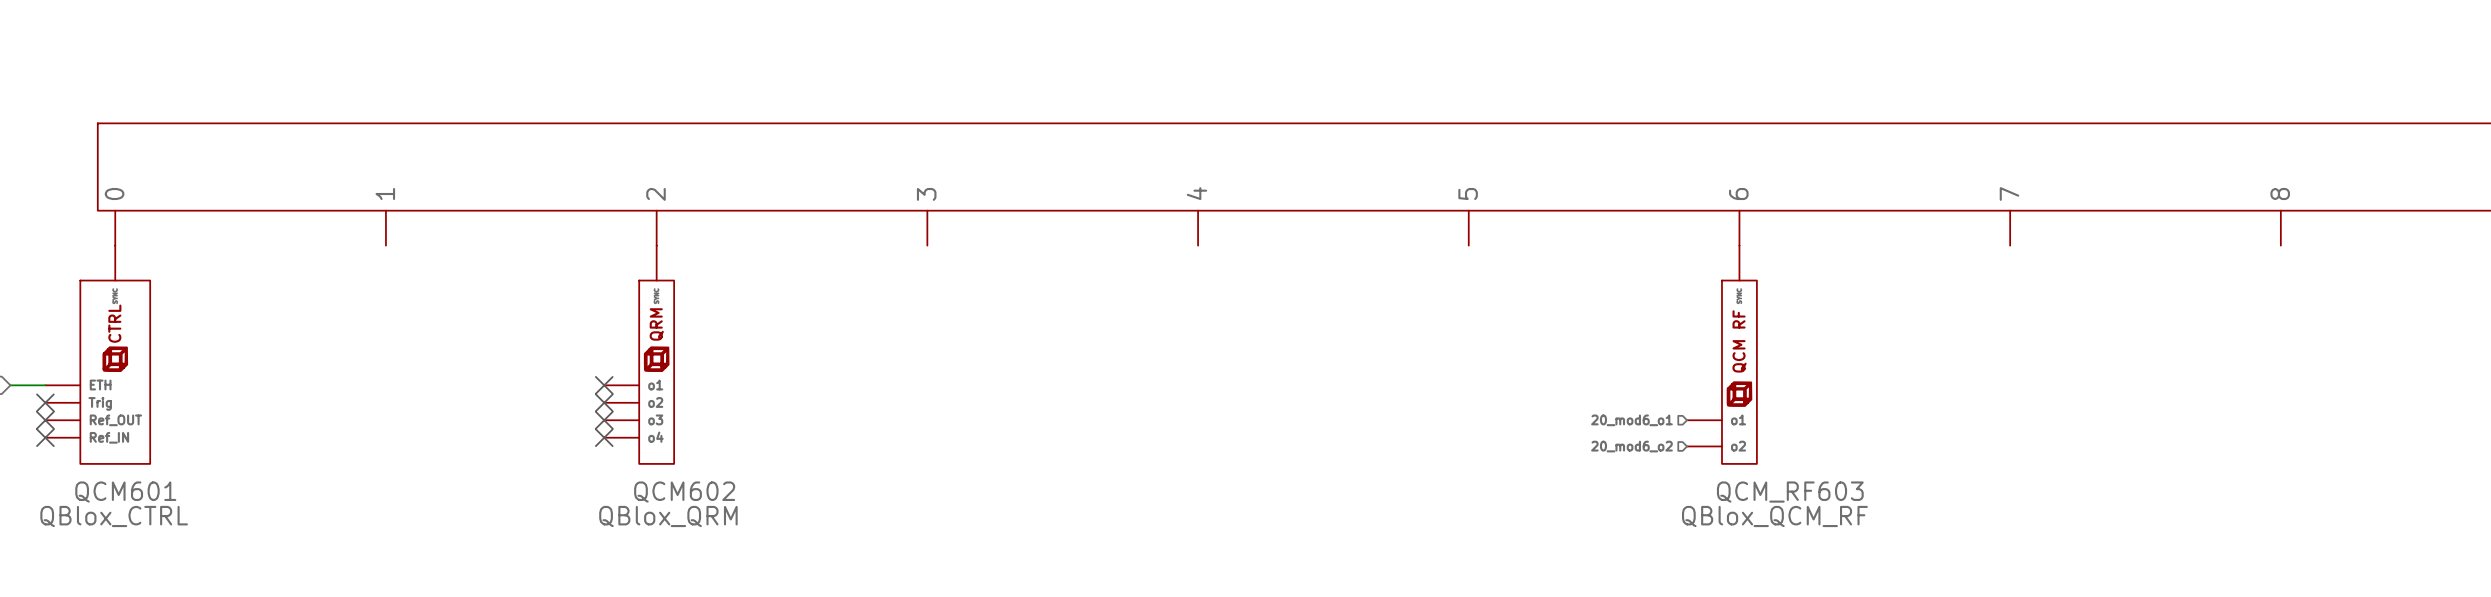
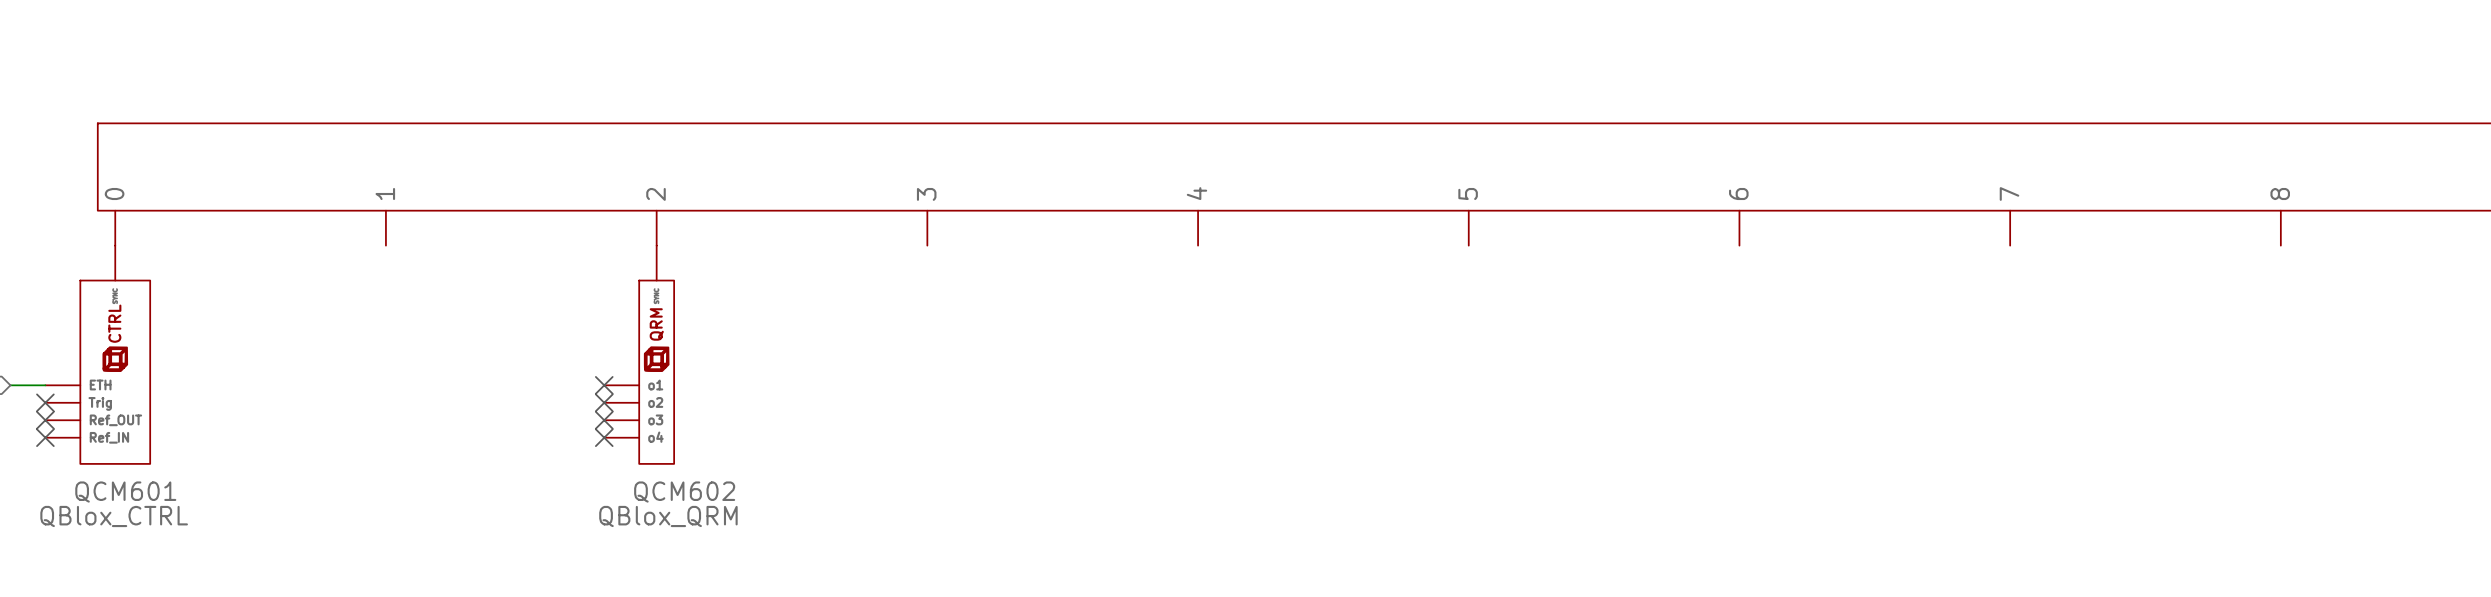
QCM_RF603: QBlox_QCM_RF (1721, 354) -> none
hierarchical label: 20_mod6_o1 (1631, 420) -> none
hierarchical label: 20_mod6_o2 (1631, 446) -> none

